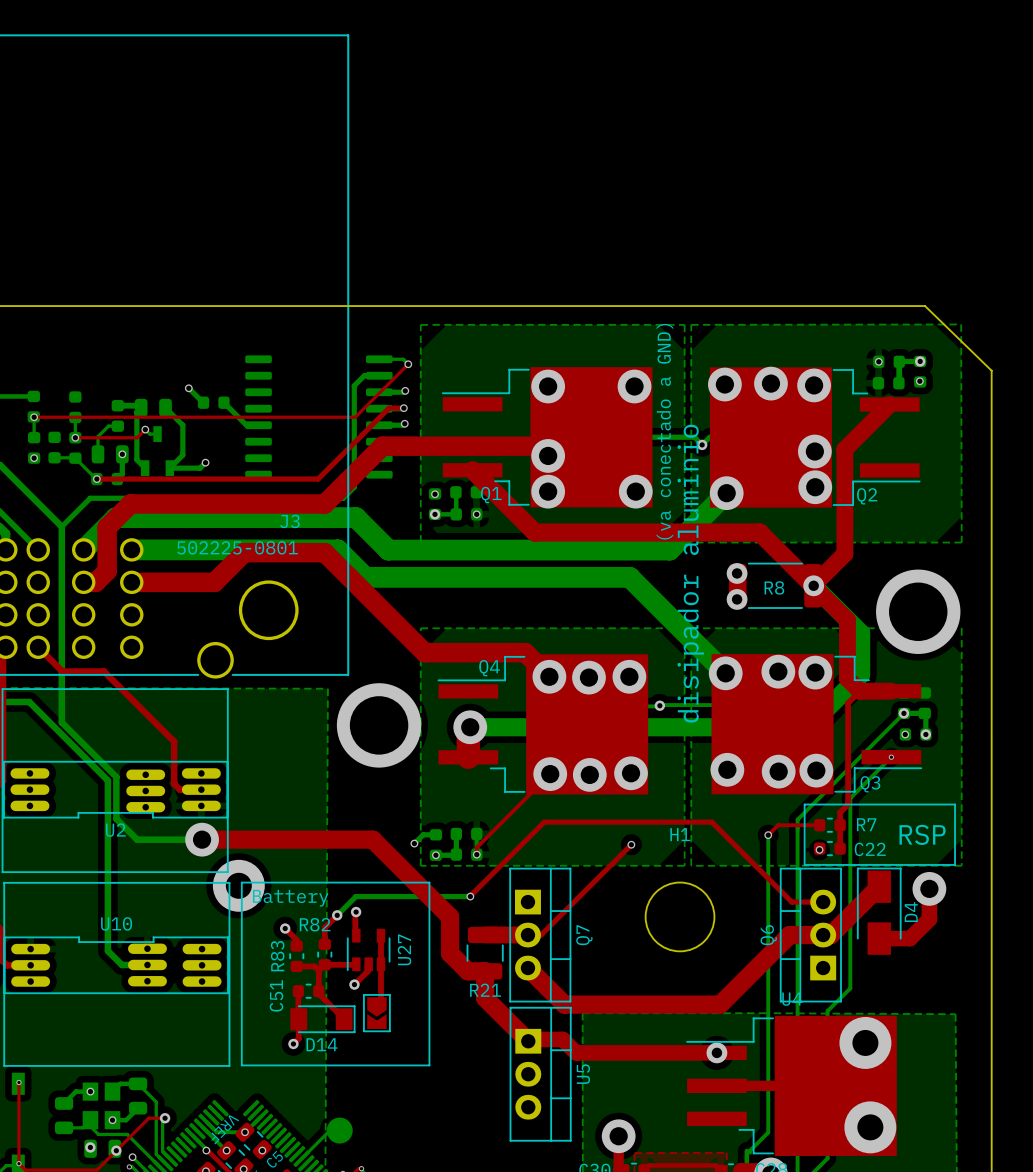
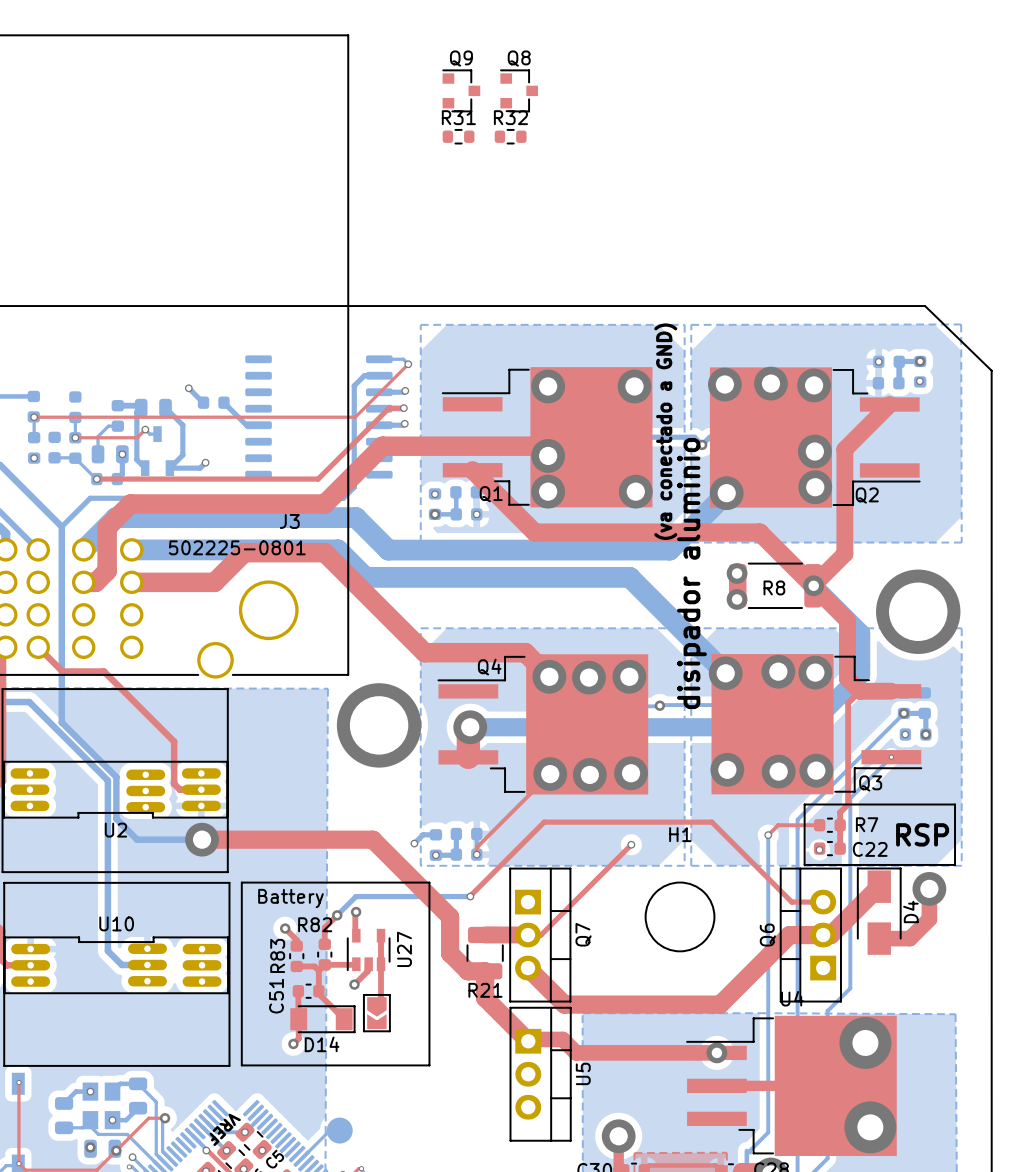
Q9: none -> (461, 90)
Q8: none -> (519, 90)
R31: none -> (458, 136)
R32: none -> (510, 136)
via: (238, 885) -> none

